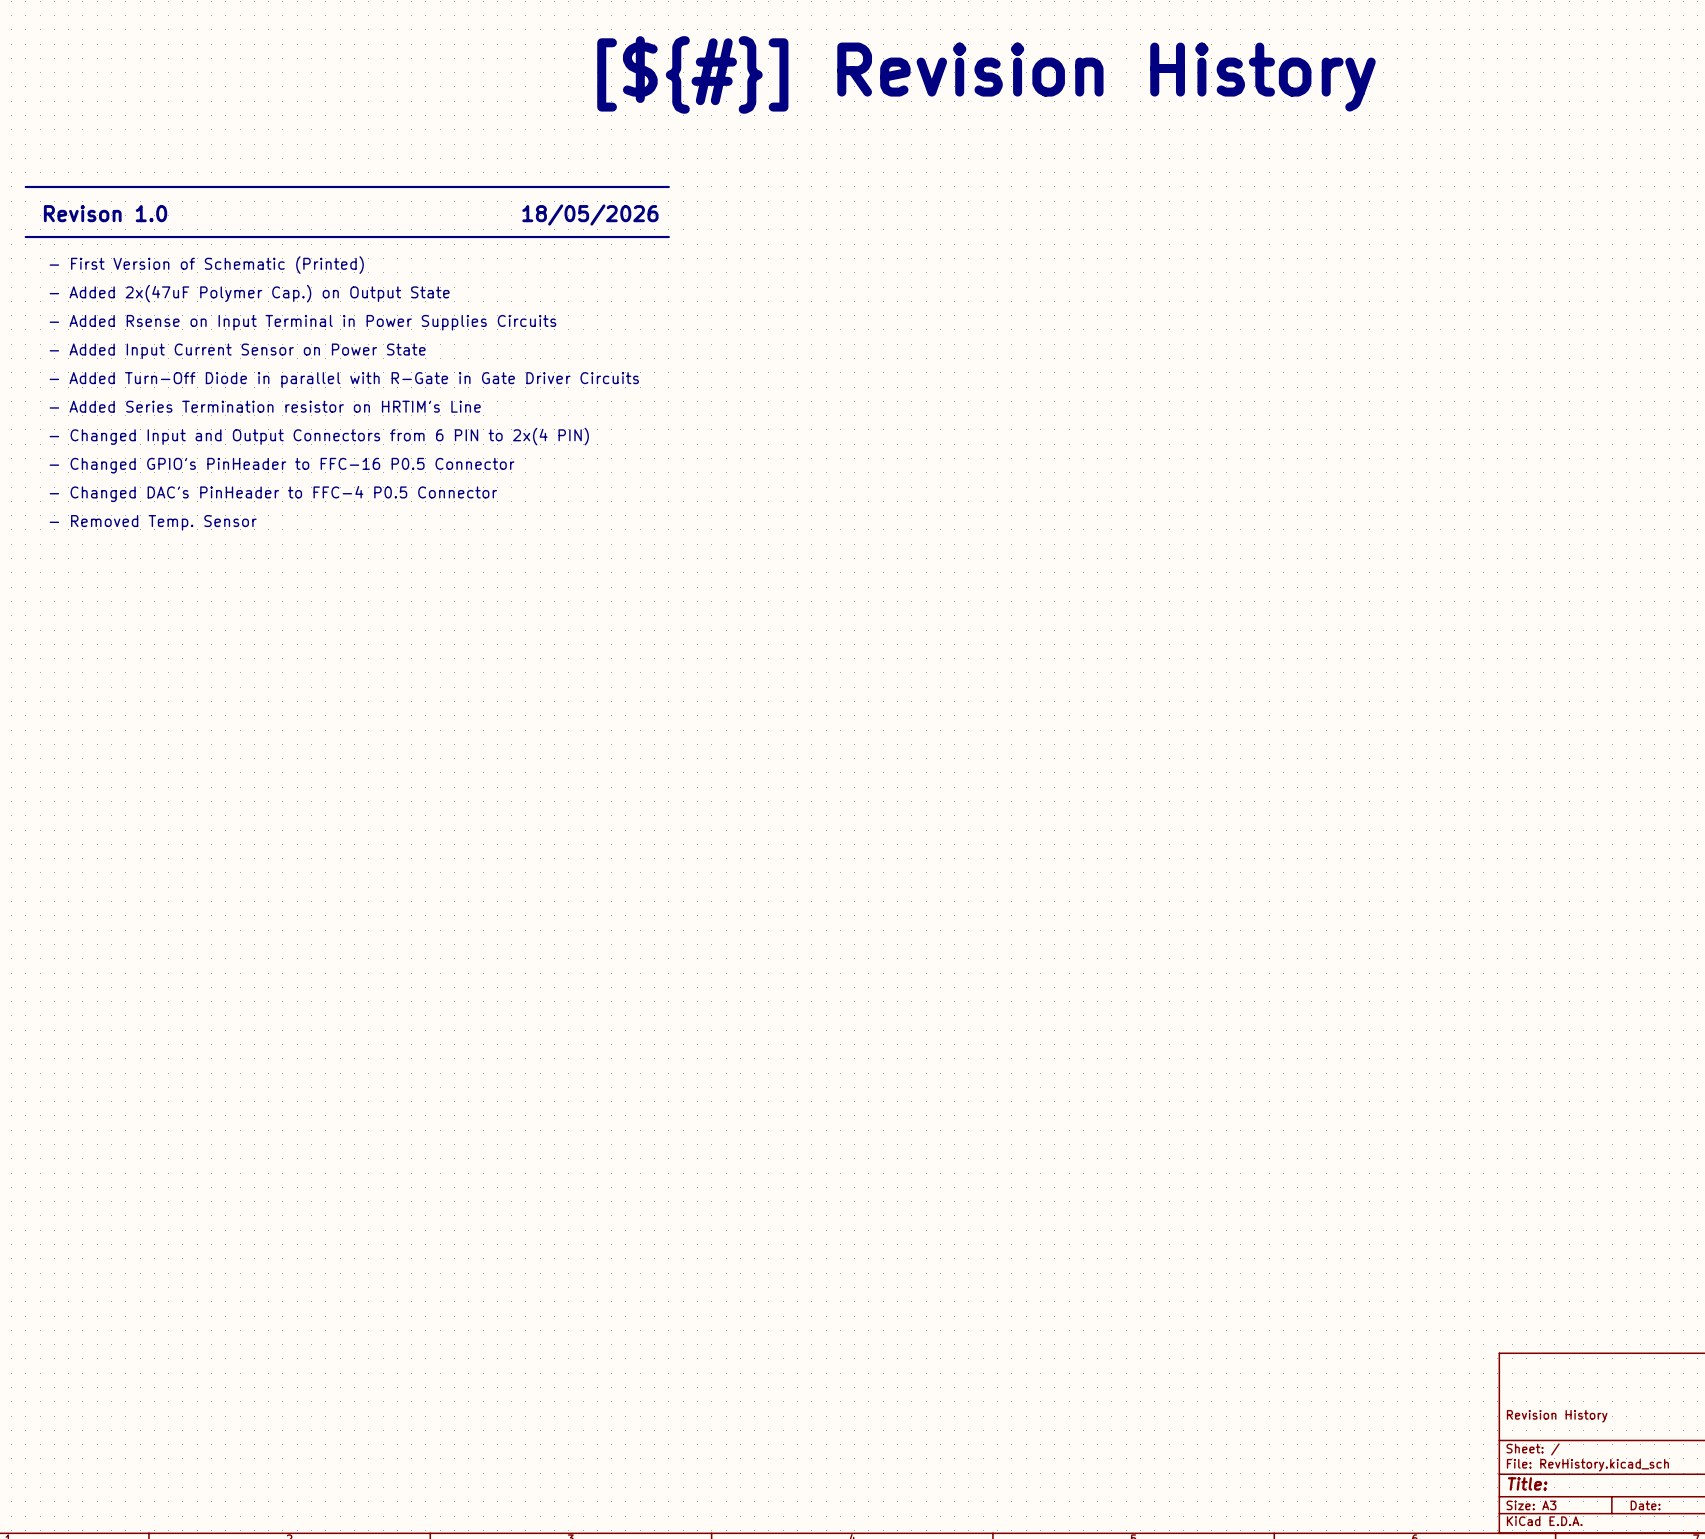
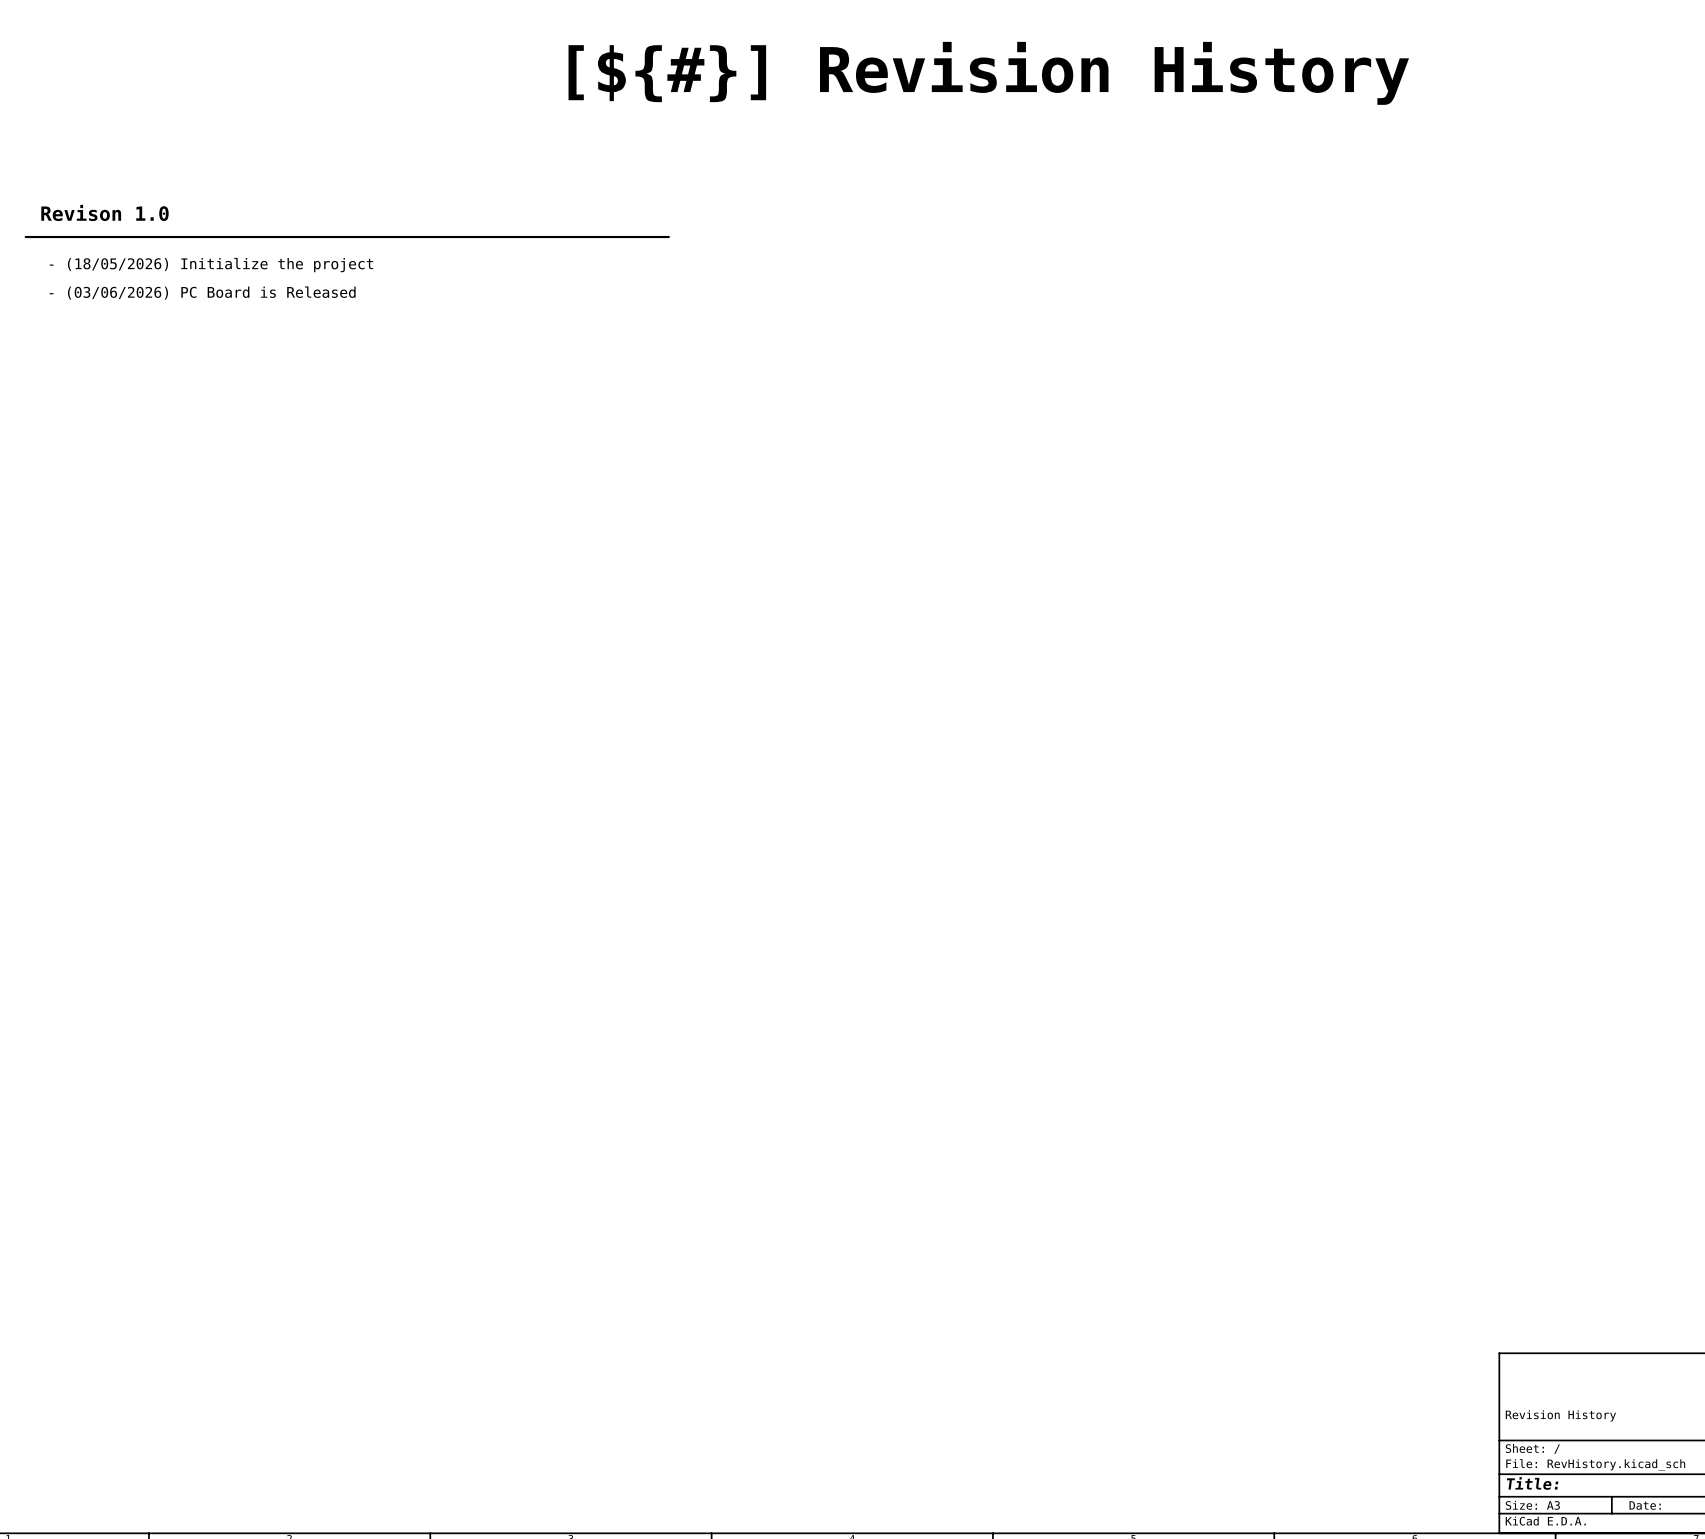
line: (25, 186) (668, 186) -> none
text: 18/05/2026 (590, 214) -> none
text: - First Version of Schematic (Printed) (206, 265) -> - (18/05/2026) Initialize the project (211, 265)
text: - Added 2x(47uF Polymer Cap.) on Output State (249, 293) -> - (03/06/2026) PC Board is Released (202, 293)
text: - Added Rsense on Input Terminal in Power Supplies Circuits (302, 322) -> none
text: - Added Input Current Sensor on Power State (237, 351) -> none
text: - Added Turn-Off Diode in parallel with R-Gate in Gate Driver Circuits (344, 379) -> none
text: - Added Series Termination resistor on HRTIM's Line (265, 406) -> none
text: - Changed Input and Output Connectors from 6 PIN to 2x(4 PIN) (319, 436) -> none
text: - Changed GPIO's PinHeader to FFC-16 P0.5 Connector (282, 465) -> none
text: - Changed DAC's PinHeader to FFC-4 P0.5 Connector (273, 493) -> none
text: - Removed Temp. Sensor (153, 522) -> none

